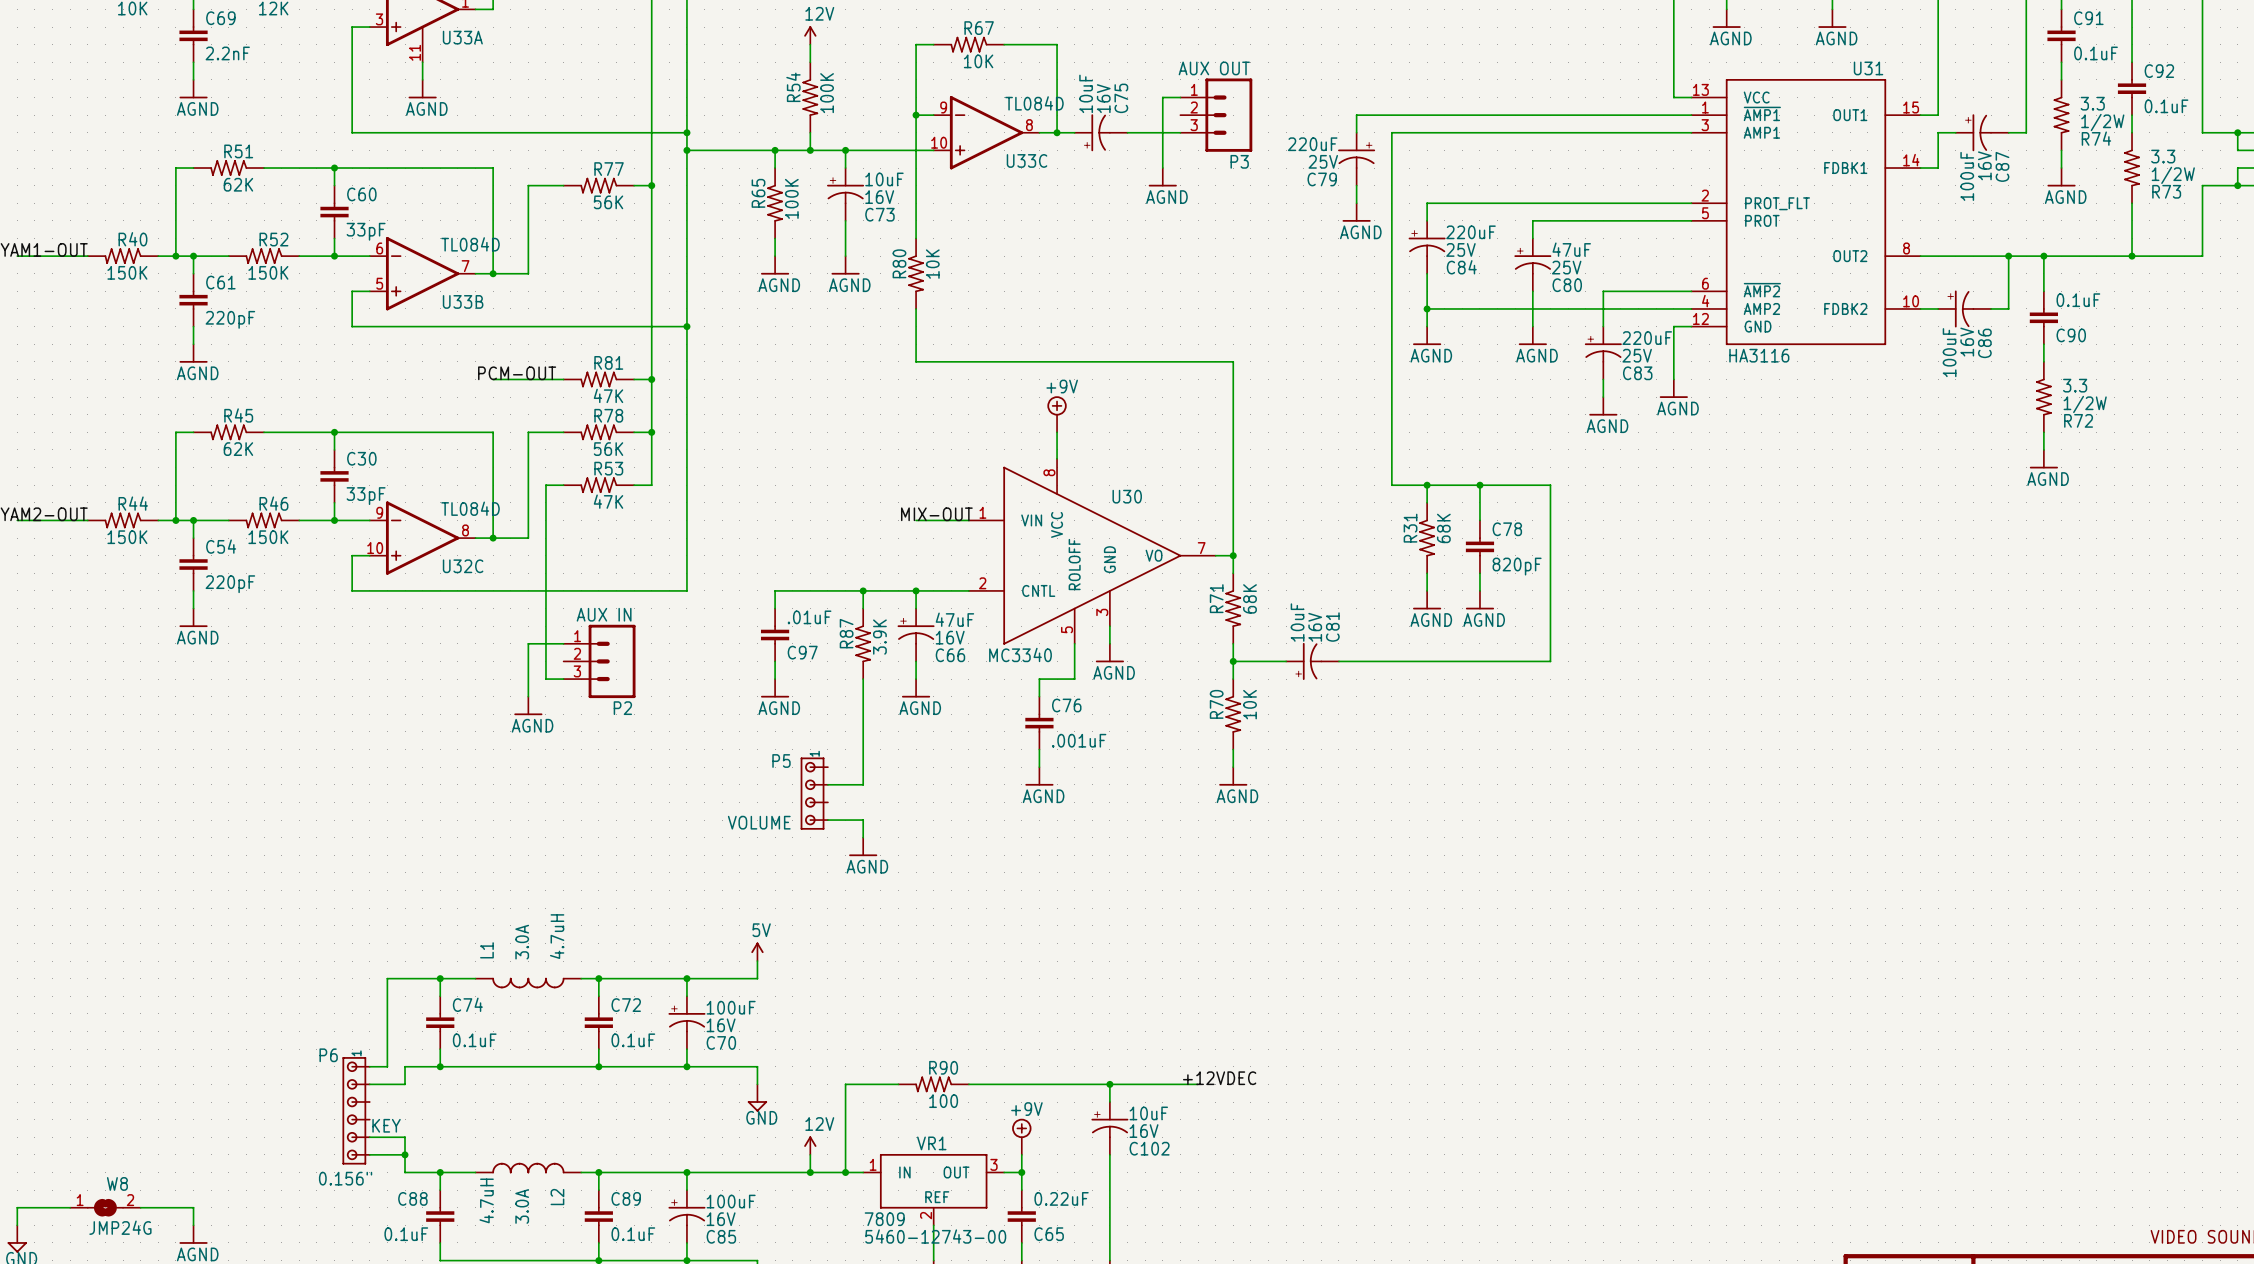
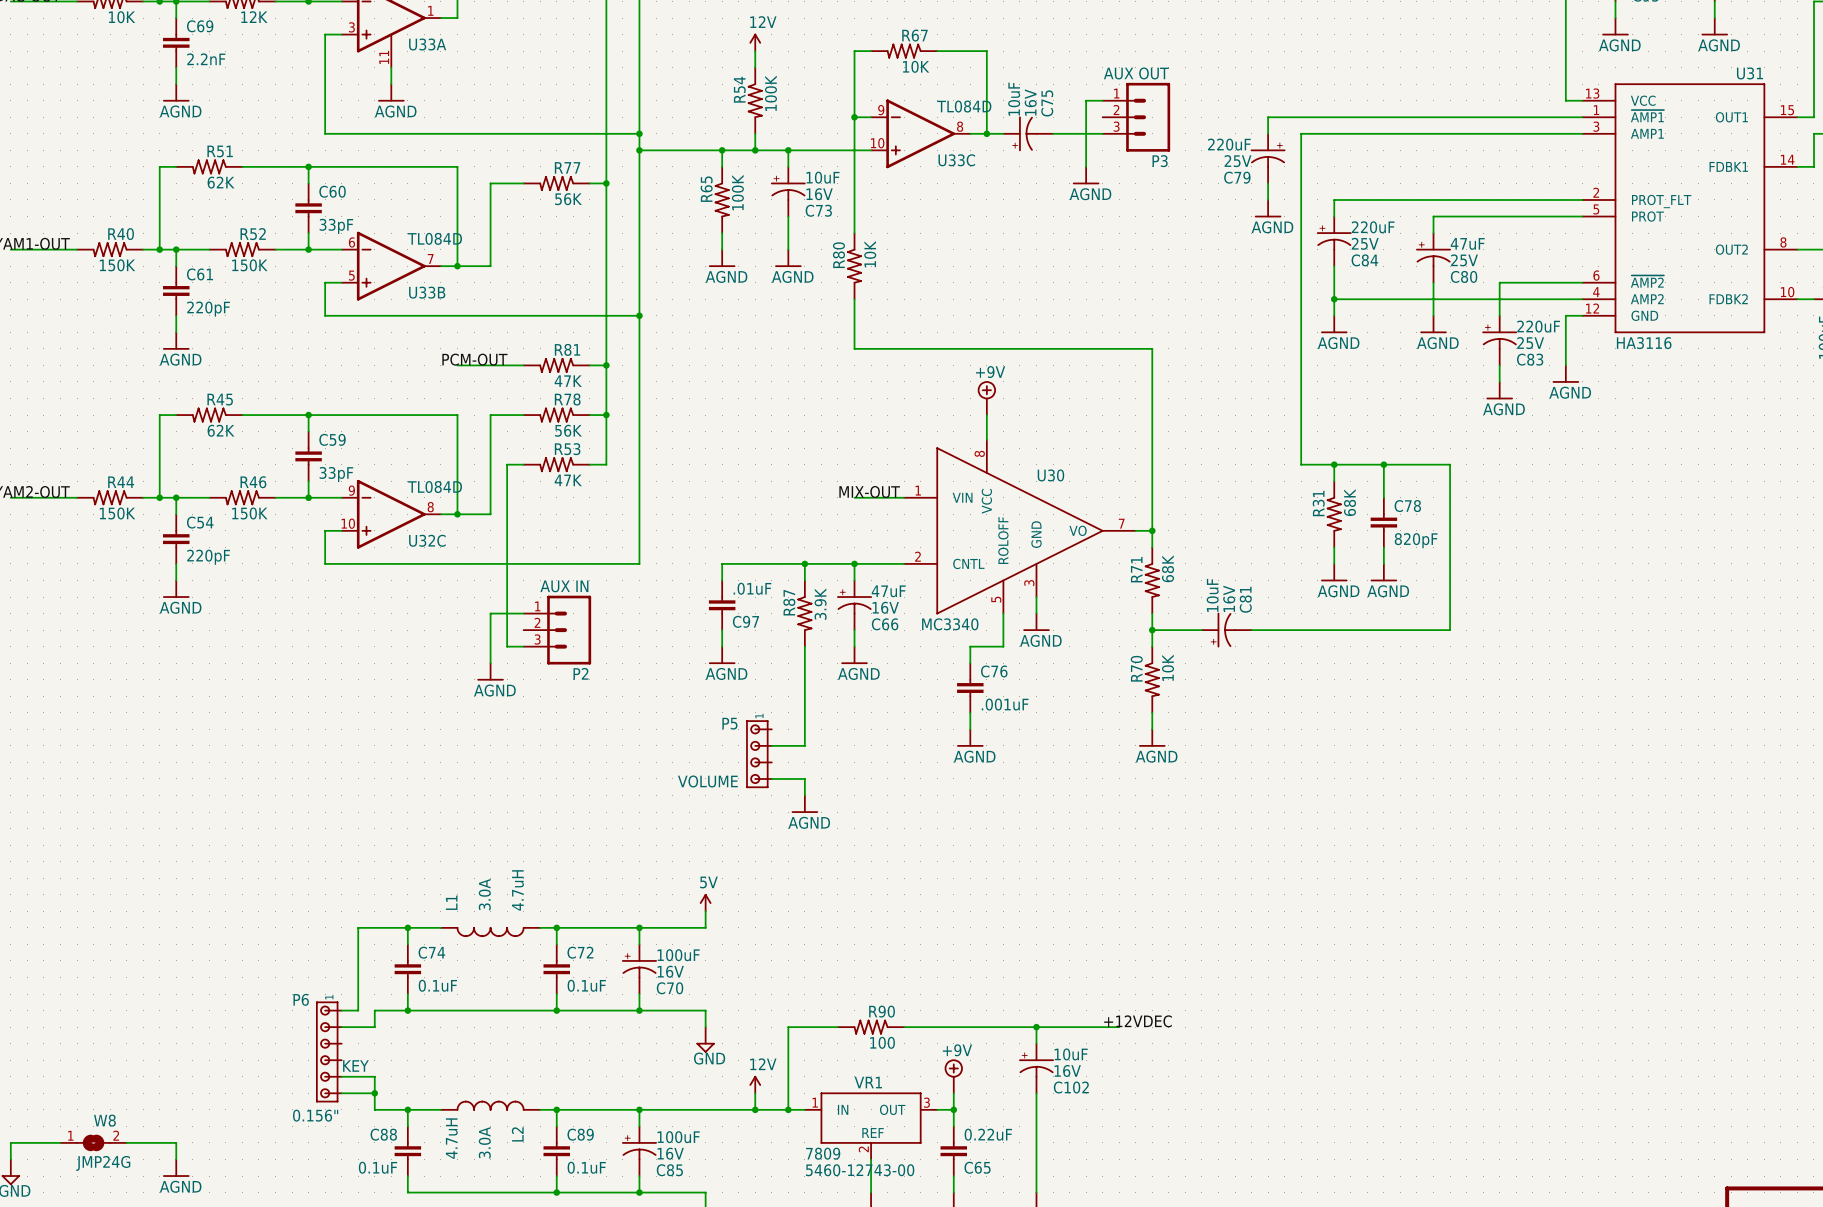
C30 name: C30 (361, 458) -> C59 (332, 439)

